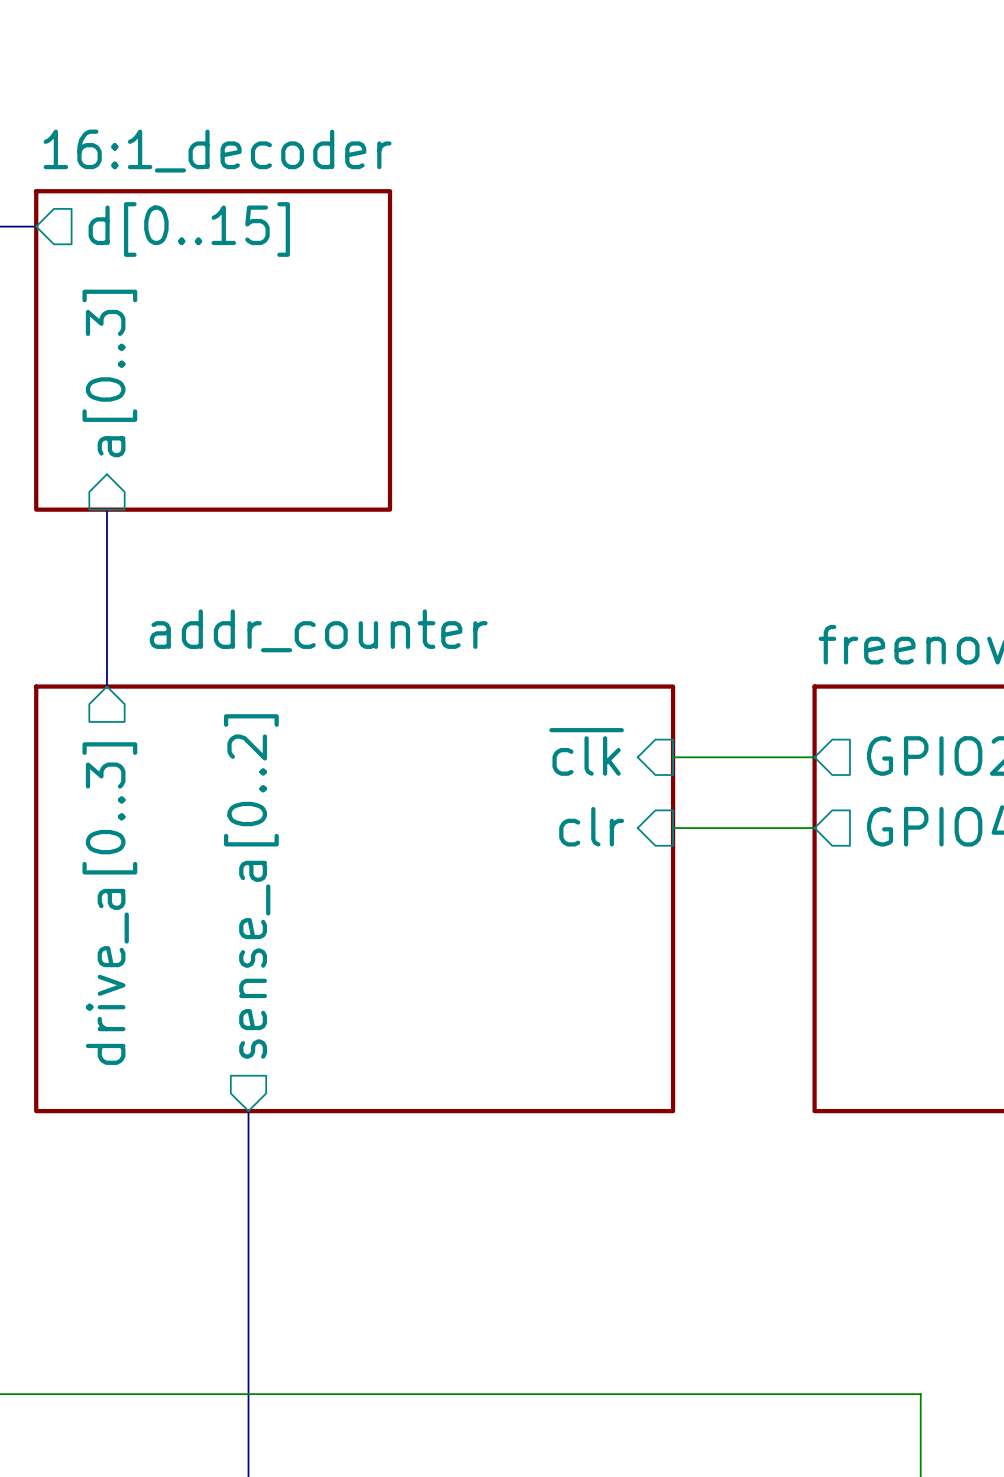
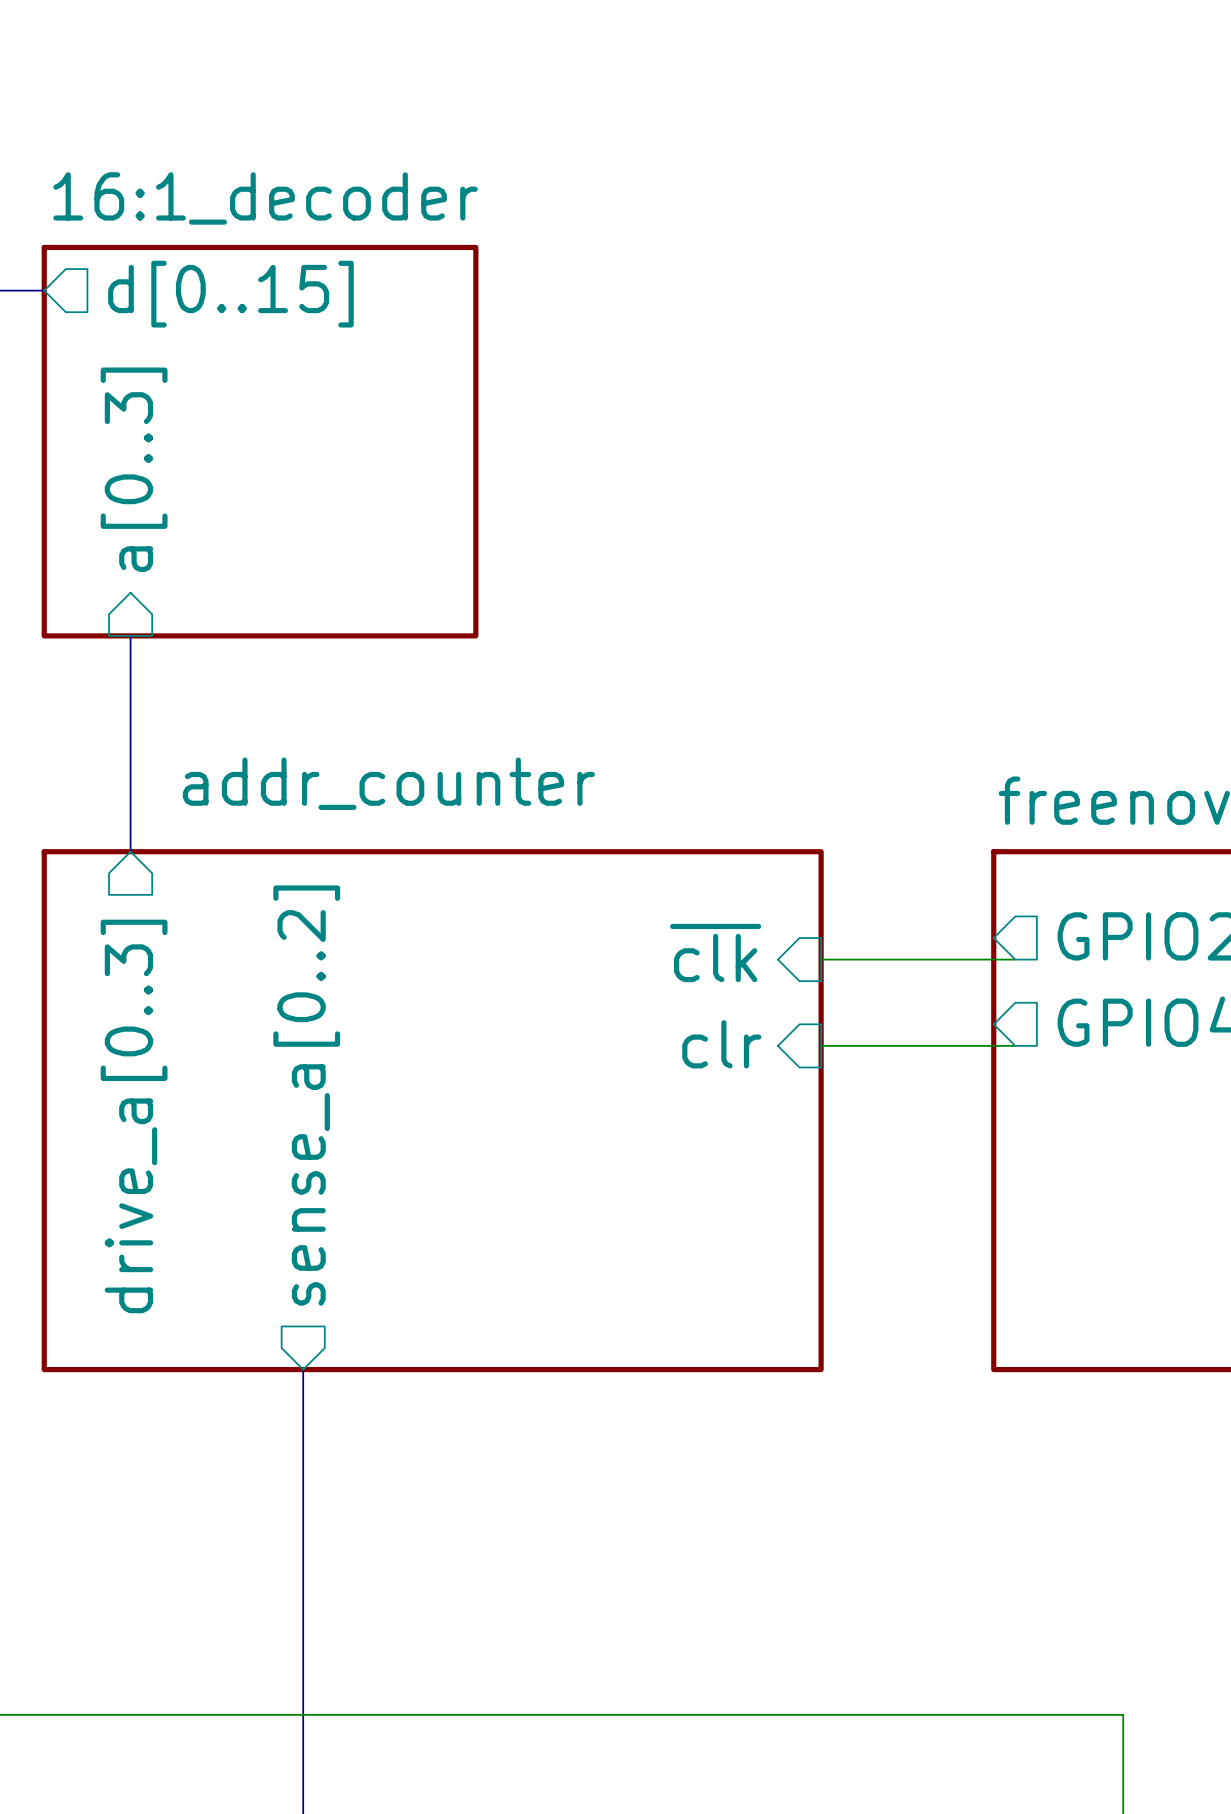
sheet pin position: ~{clk} (586, 751) -> ~{clk} (715, 953)
wire: (673, 757) (814, 757) -> none
wire: none -> (821, 959) (1015, 959)
sheet pin position: clr (591, 826) -> clr (721, 1044)
wire: (673, 828) (814, 828) -> none
wire: none -> (821, 1045) (1015, 1045)

